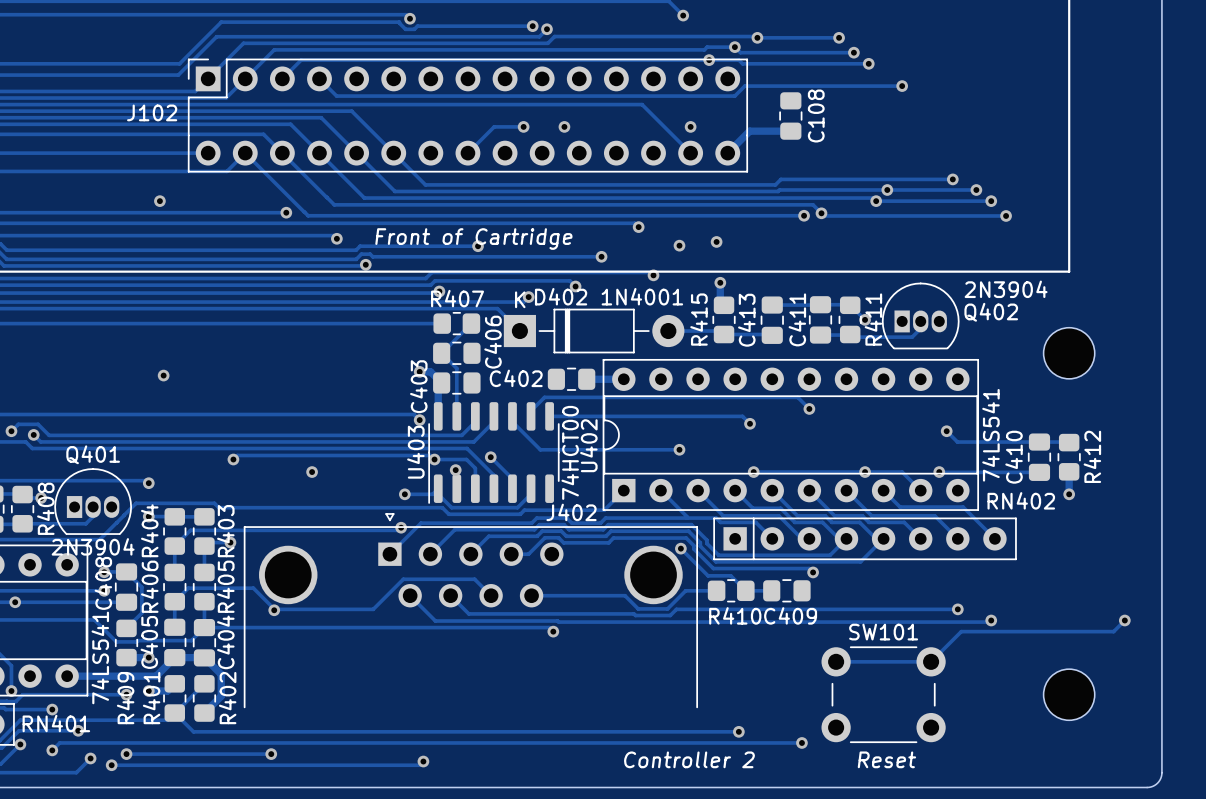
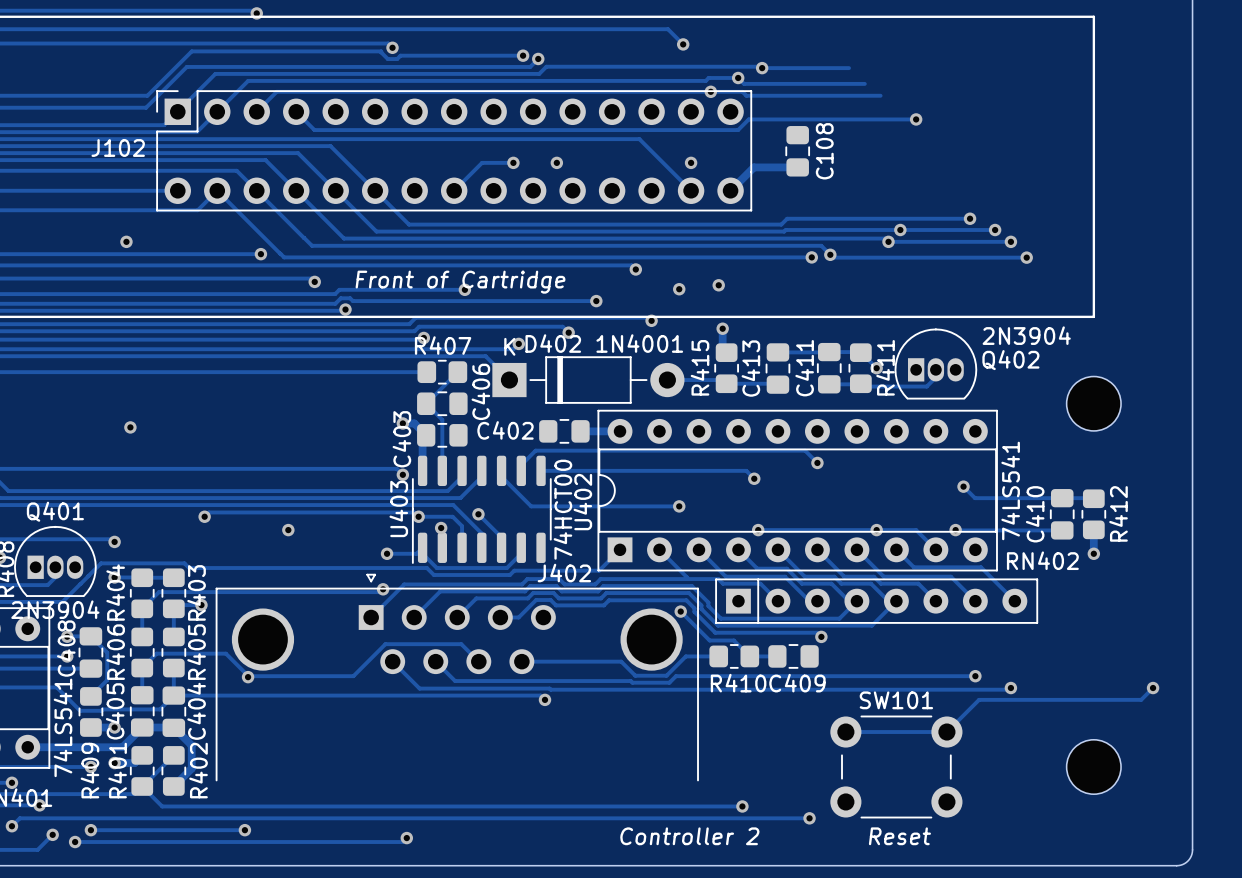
via: (839, 37) -> none
via: (853, 52) -> none
via: (868, 63) -> none

